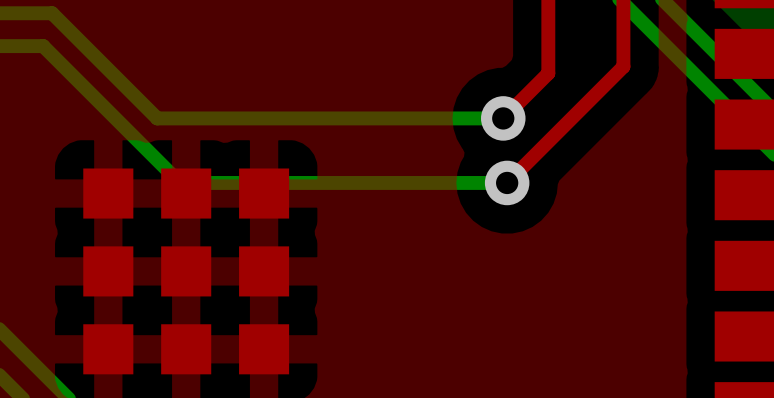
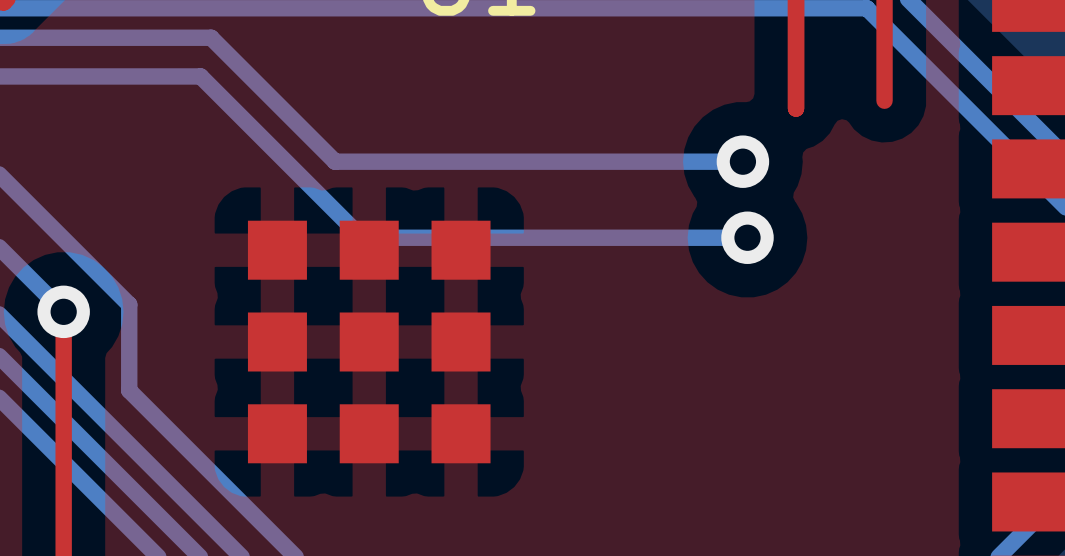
top track: (623, 66) (507, 182) -> none
top track: (548, 73) (503, 118) -> none

